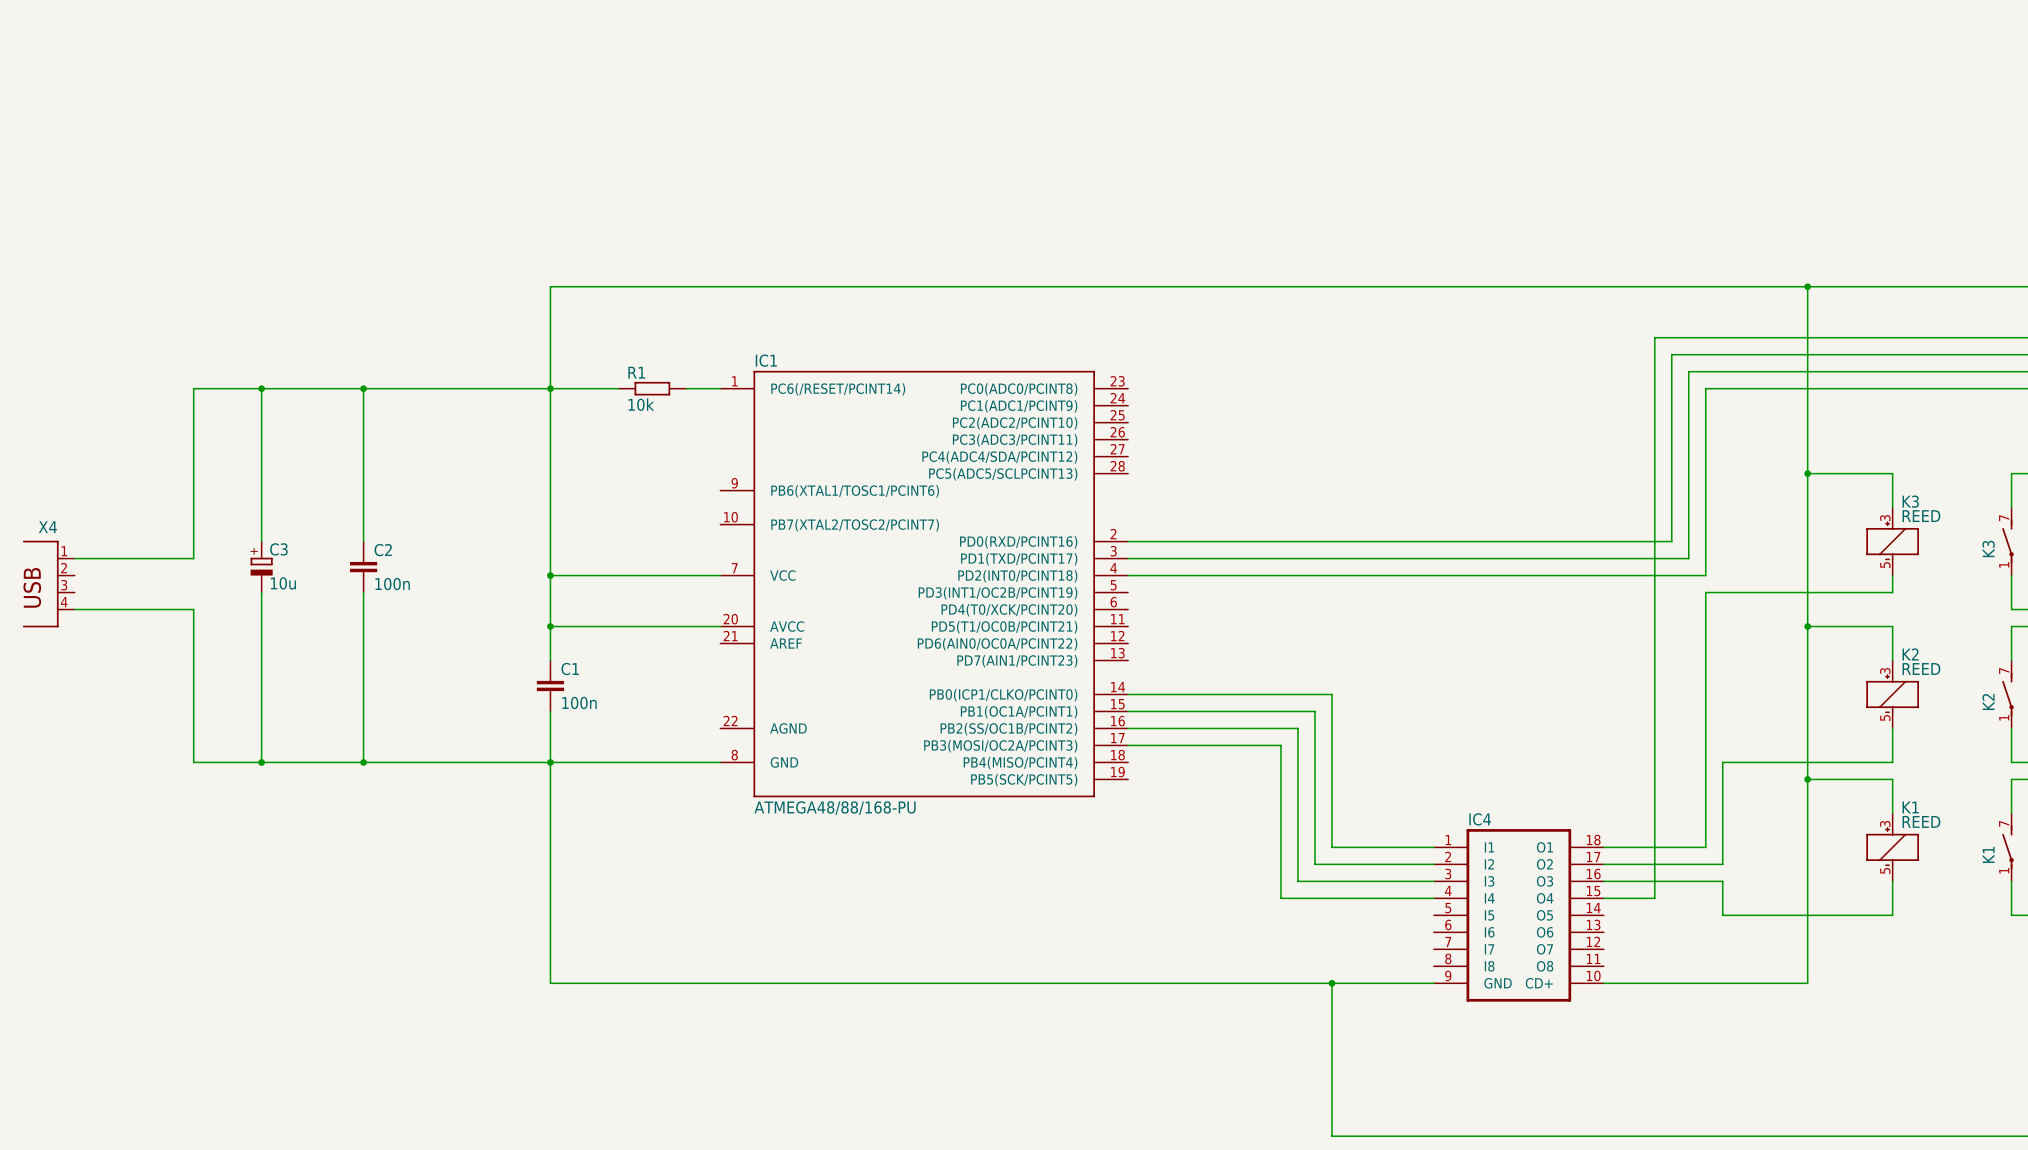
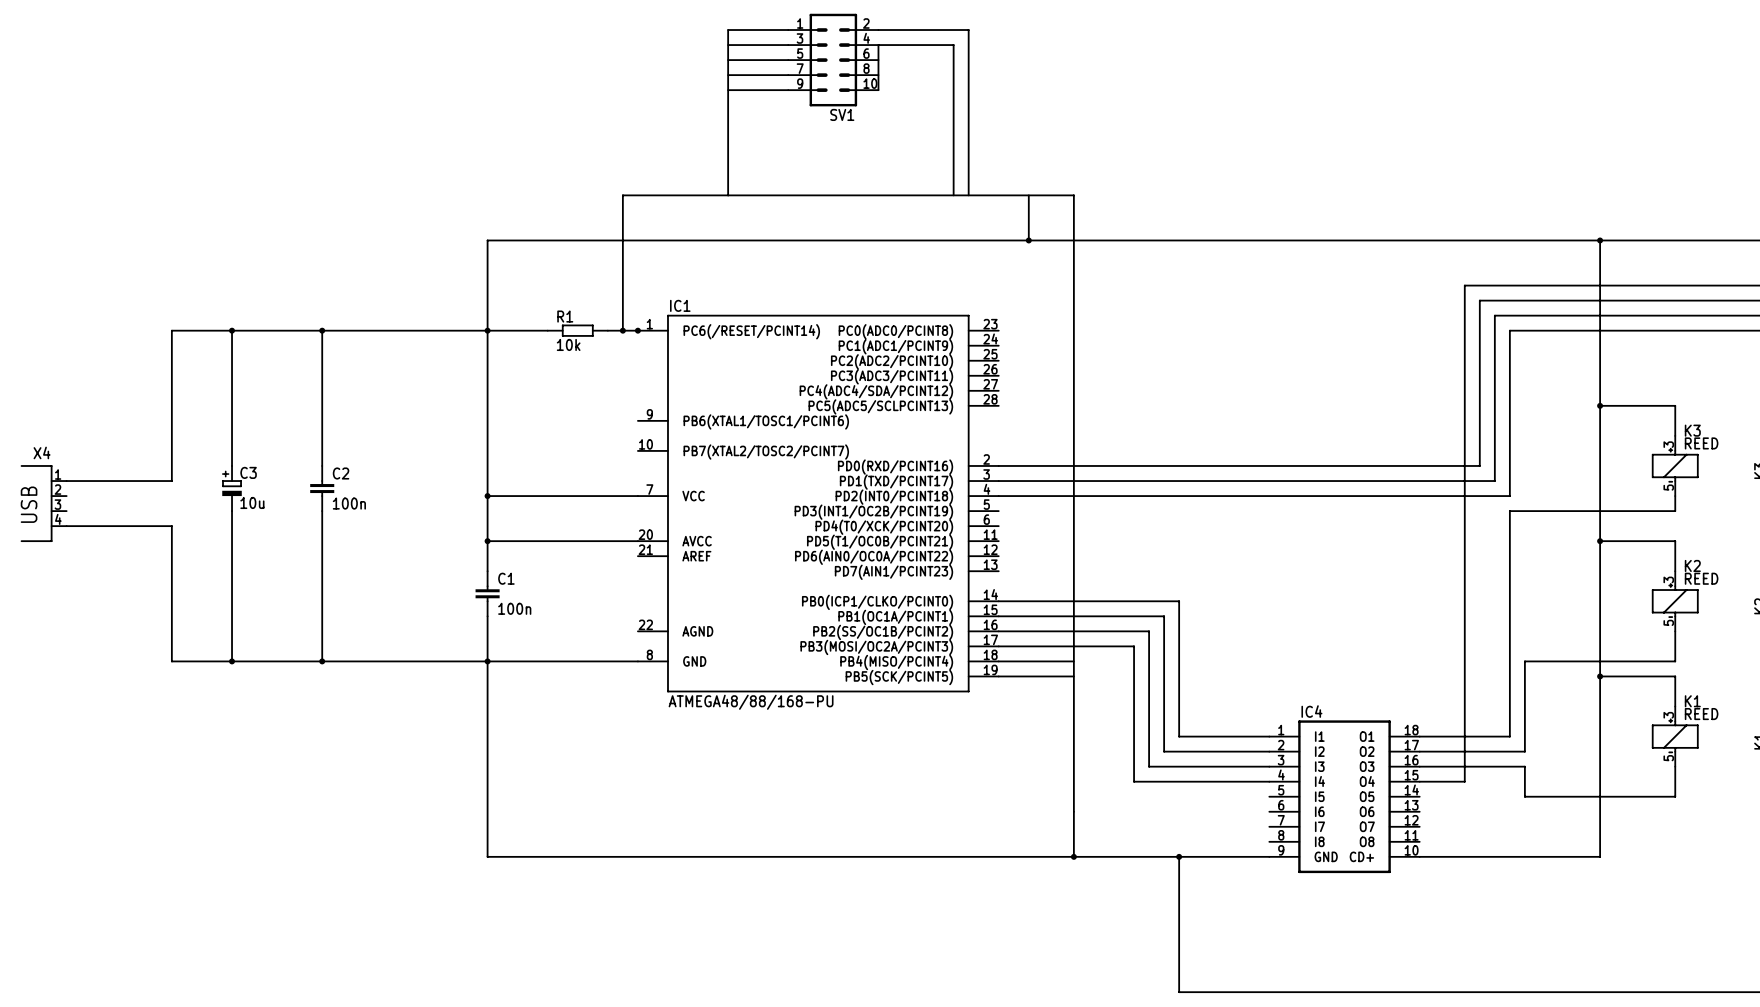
wire: none -> (728, 30) (788, 30)
bus: none -> (728, 30) (728, 195) (1073, 195) (1073, 811)
wire: none -> (878, 30) (968, 30) (968, 195)
wire: none -> (728, 45) (788, 45)
wire: none -> (728, 60) (788, 60)
SV1: none -> (833, 60)
wire: none -> (728, 75) (788, 75)
wire: none -> (728, 90) (788, 90)
wire: none -> (878, 90) (878, 45) (953, 45) (953, 195)
wire: none -> (728, 195) (622, 195) (622, 330)
wire: none -> (1028, 195) (1028, 240)
junction: none -> (1028, 240)
junction: none -> (622, 330)
junction: none -> (637, 330)
wire: none -> (998, 661) (1073, 661)
wire: none -> (998, 676) (1073, 676)
wire: none -> (1073, 811) (1073, 856)
junction: none -> (1073, 856)

